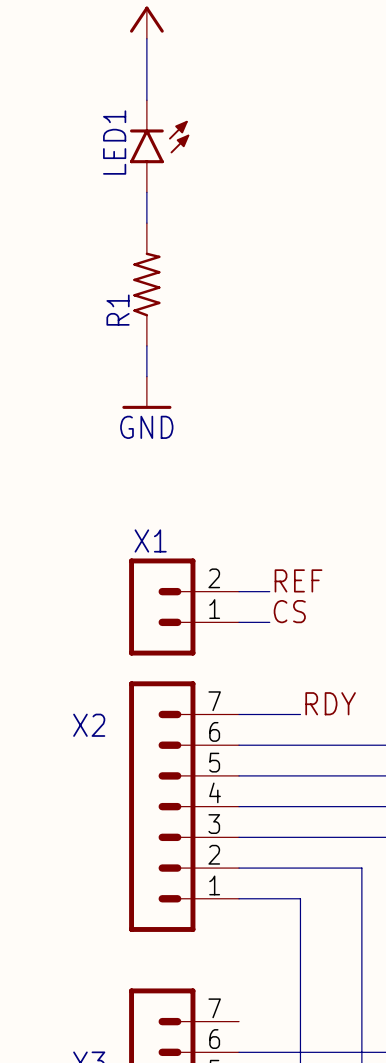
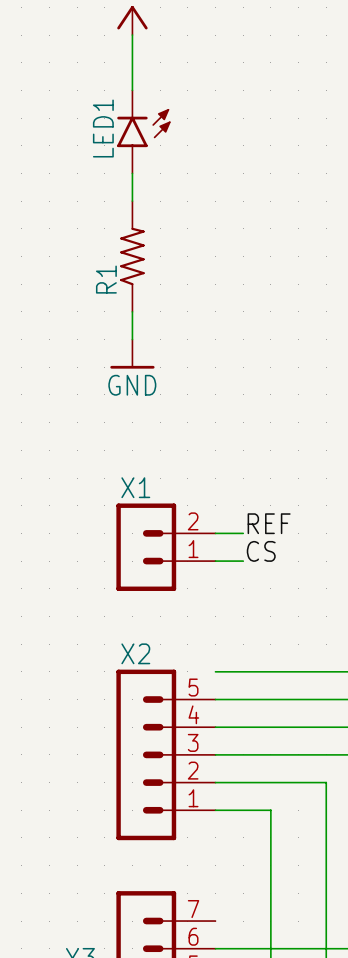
X2 symbol: [129, 681, 240, 932] -> [116, 669, 216, 841]
label: RDY (330, 703) -> none
wire: (239, 714) (300, 714) -> none
X2 name position: X2 (89, 725) -> X2 (135, 653)

